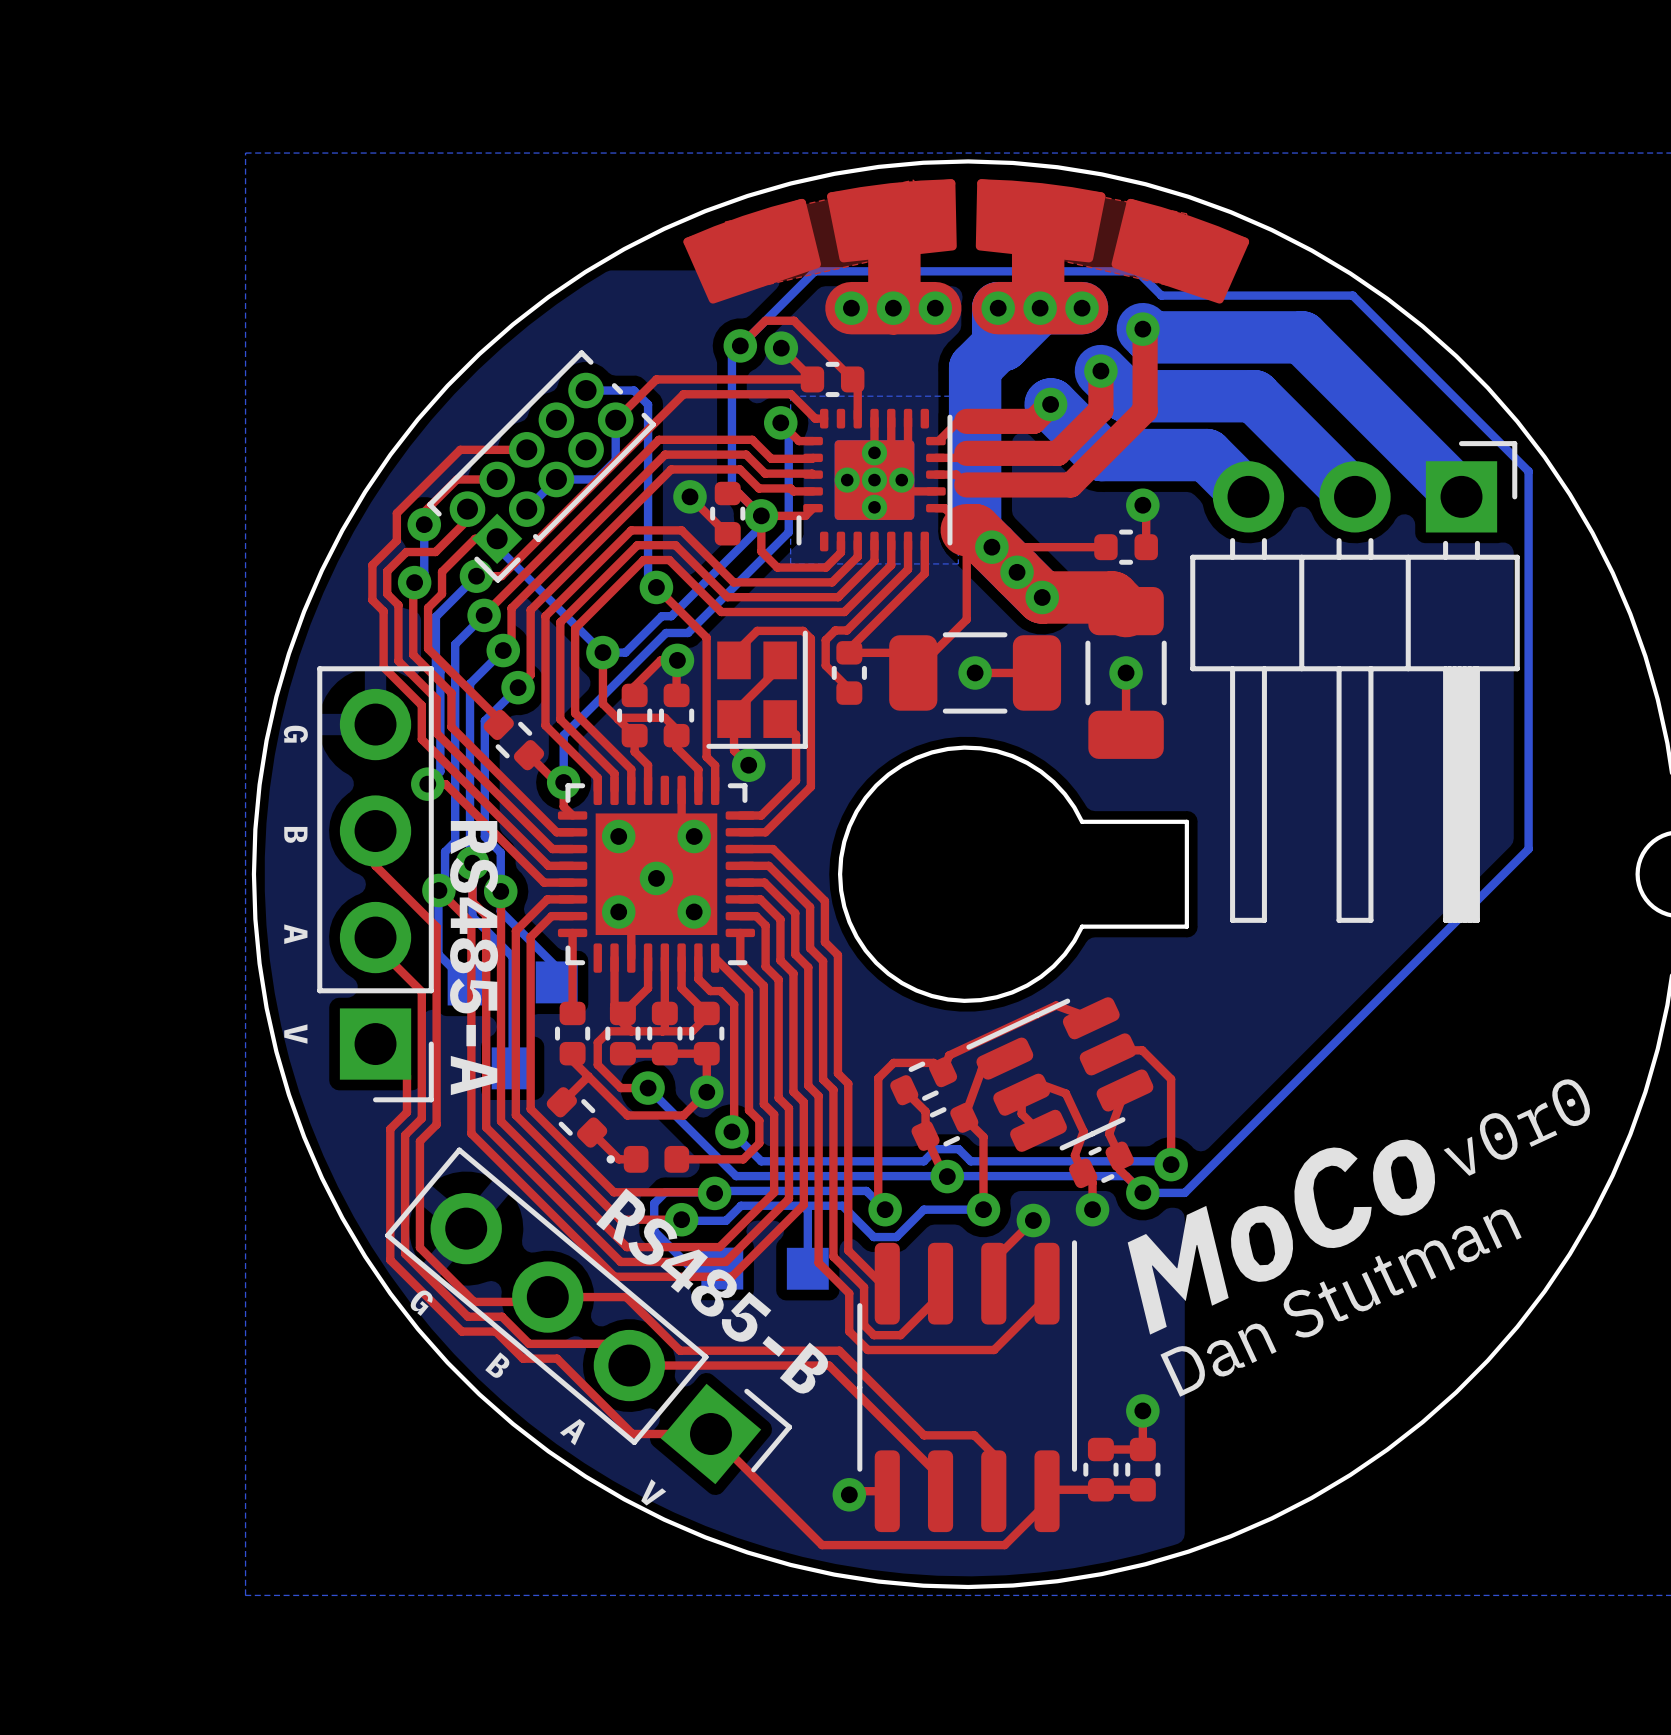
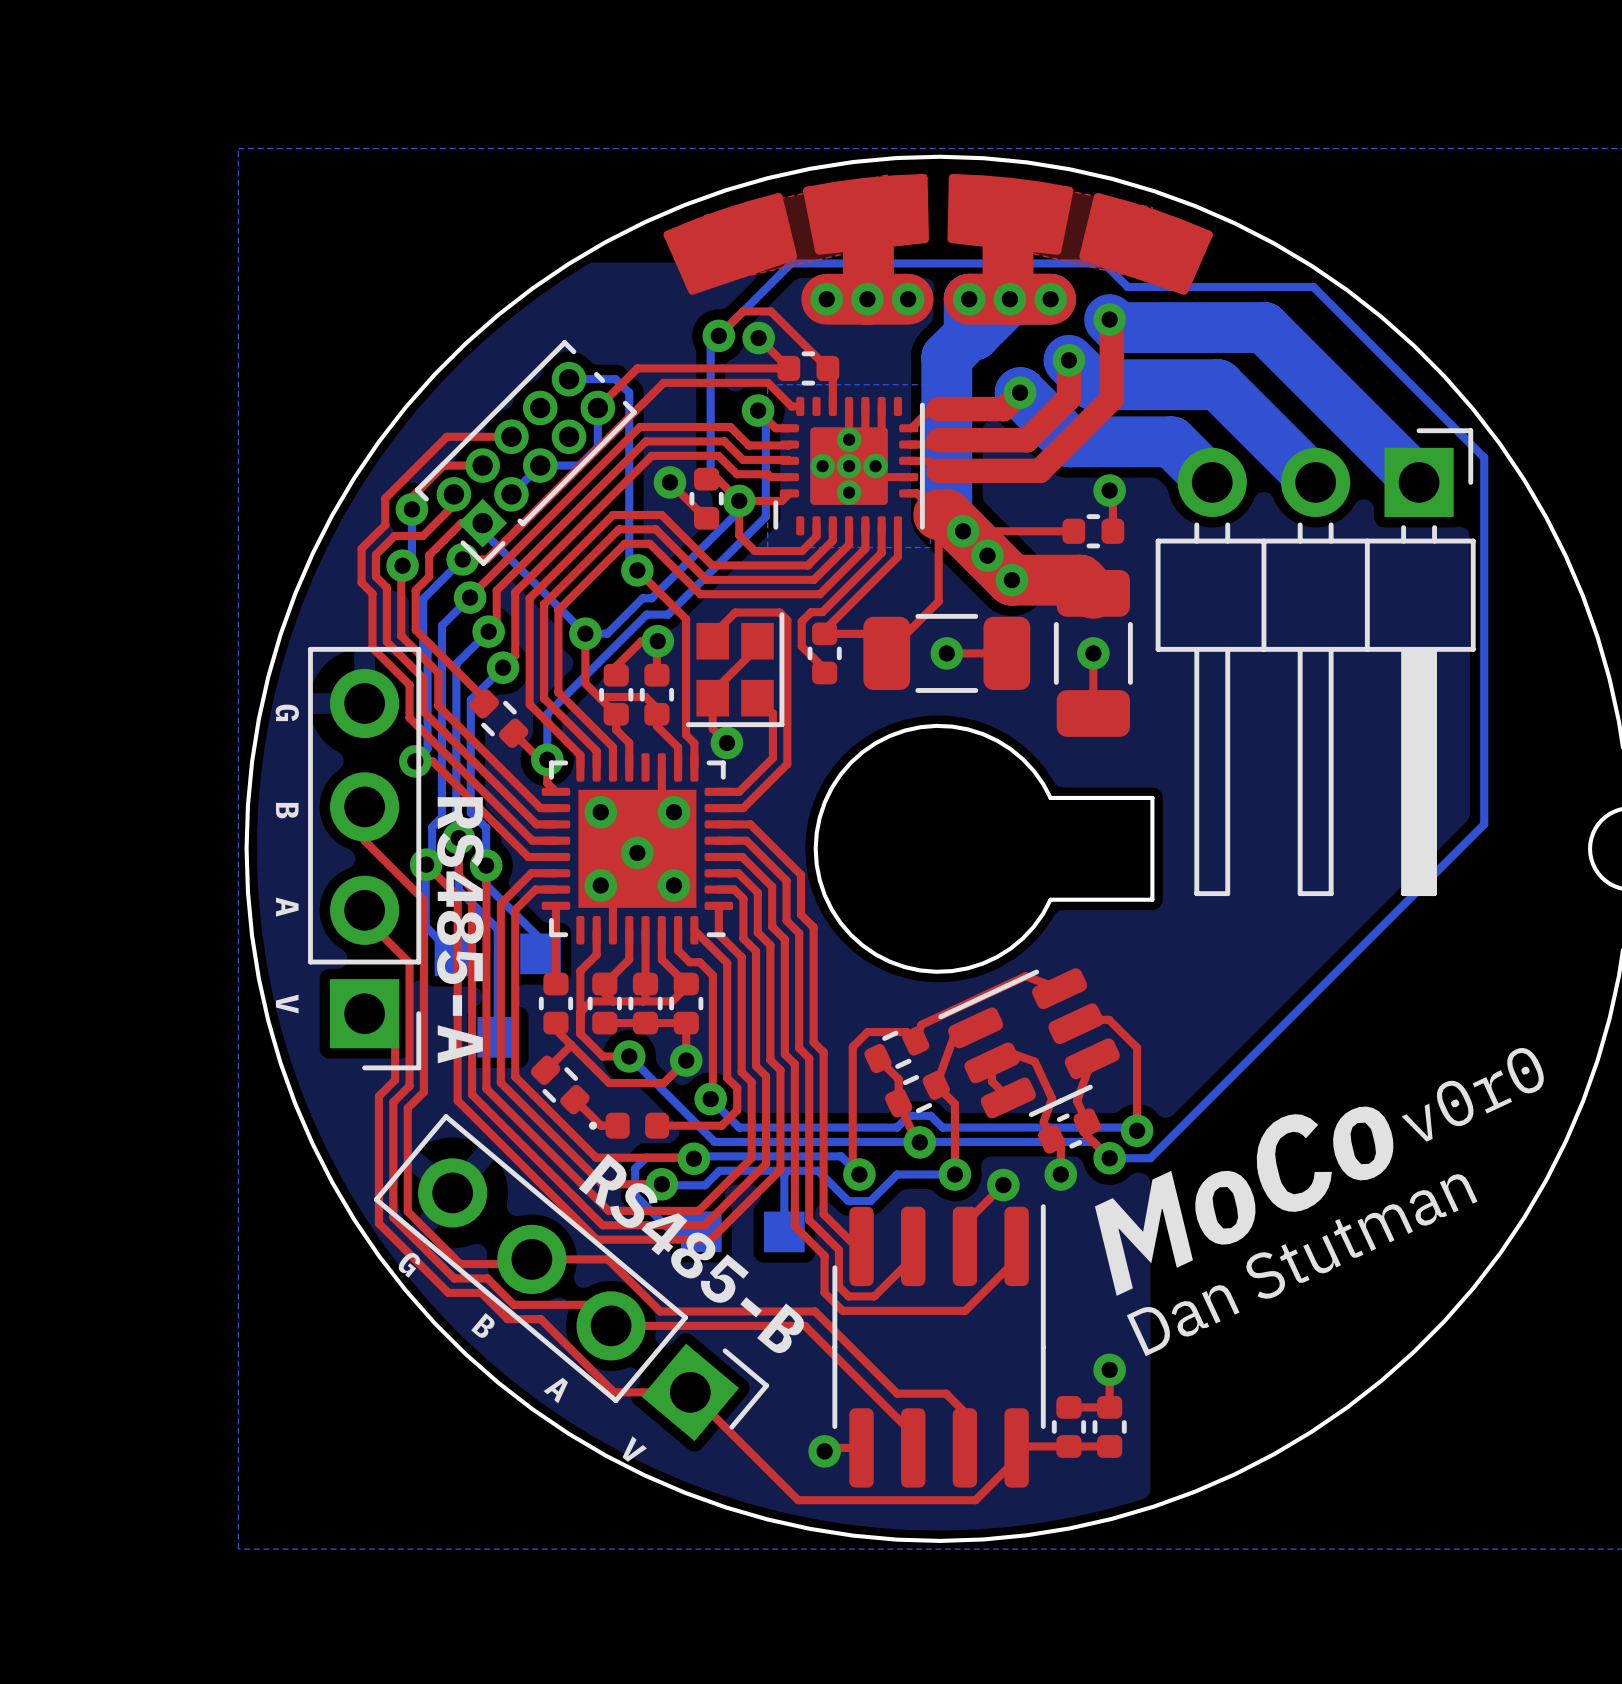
top track: (614, 983) (614, 1005) (622, 1013) -> (596, 954) (580, 970) (580, 1012)

